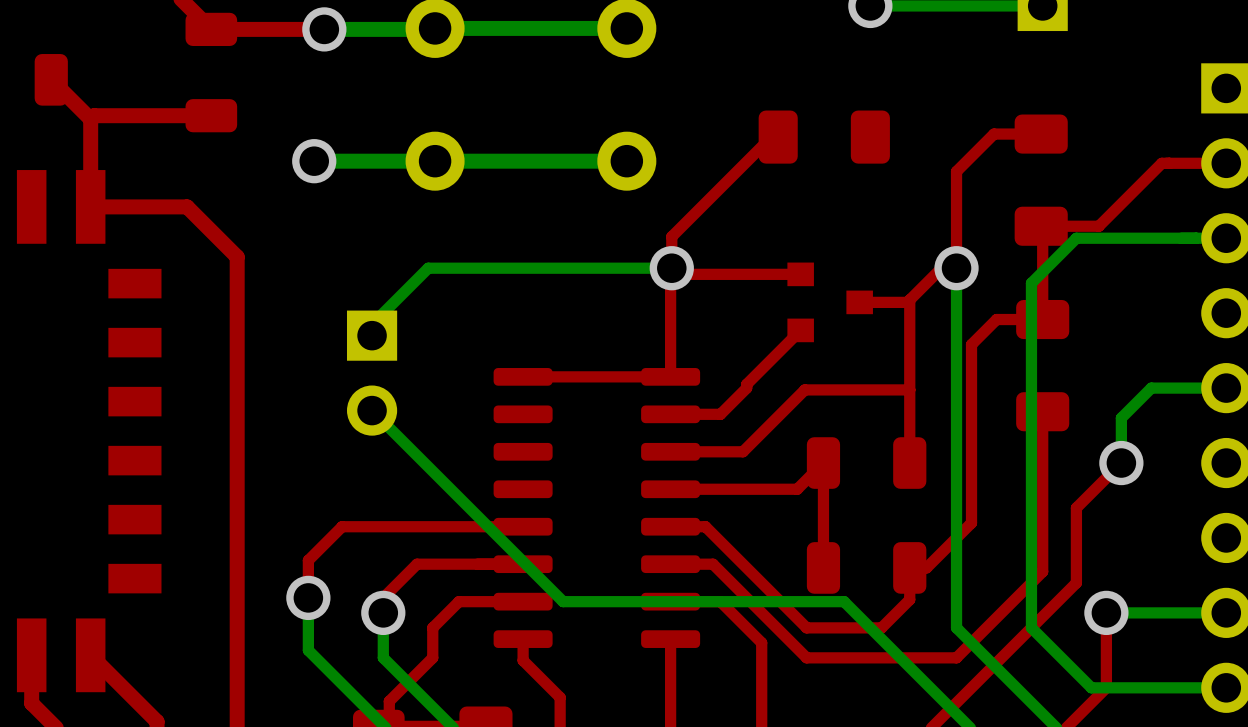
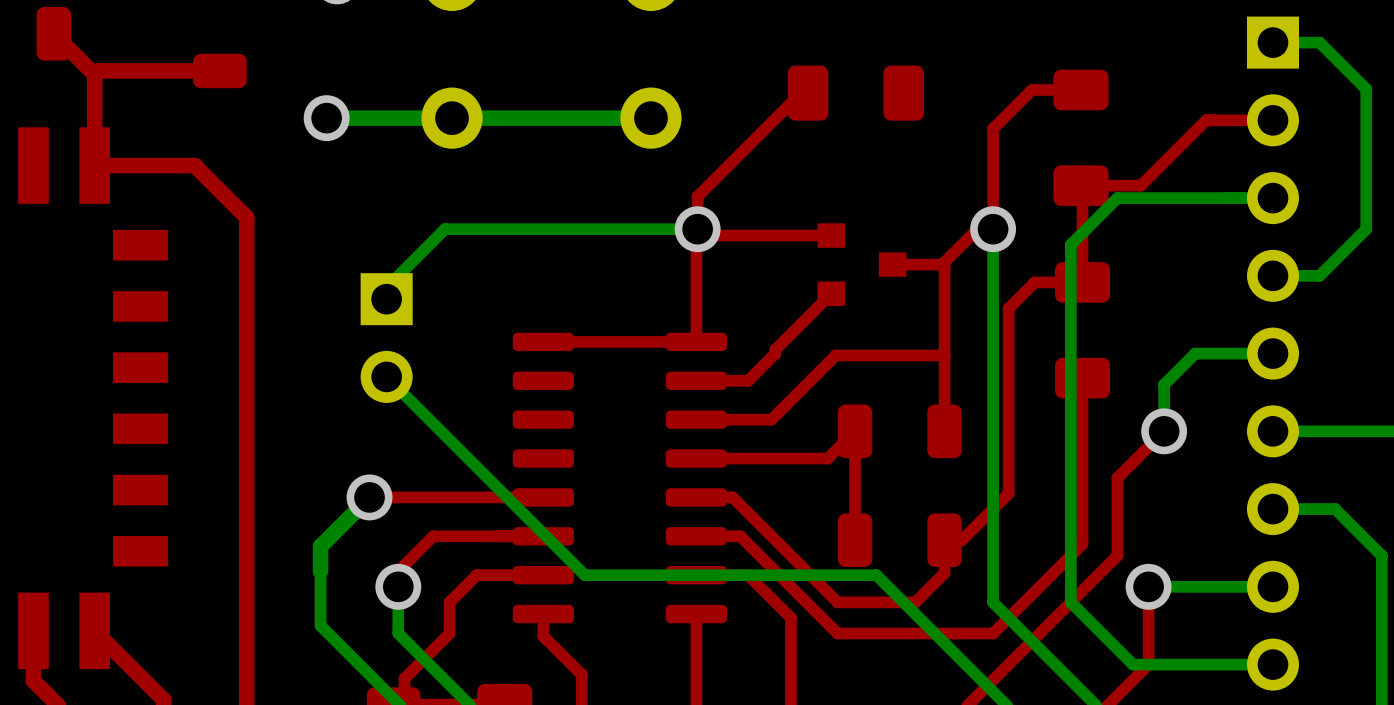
top track: (342, 526) (308, 560) (308, 597) -> none
bottom track: none -> (369, 497) (320, 546) (320, 571)
via position: (308, 597) -> (369, 497)

